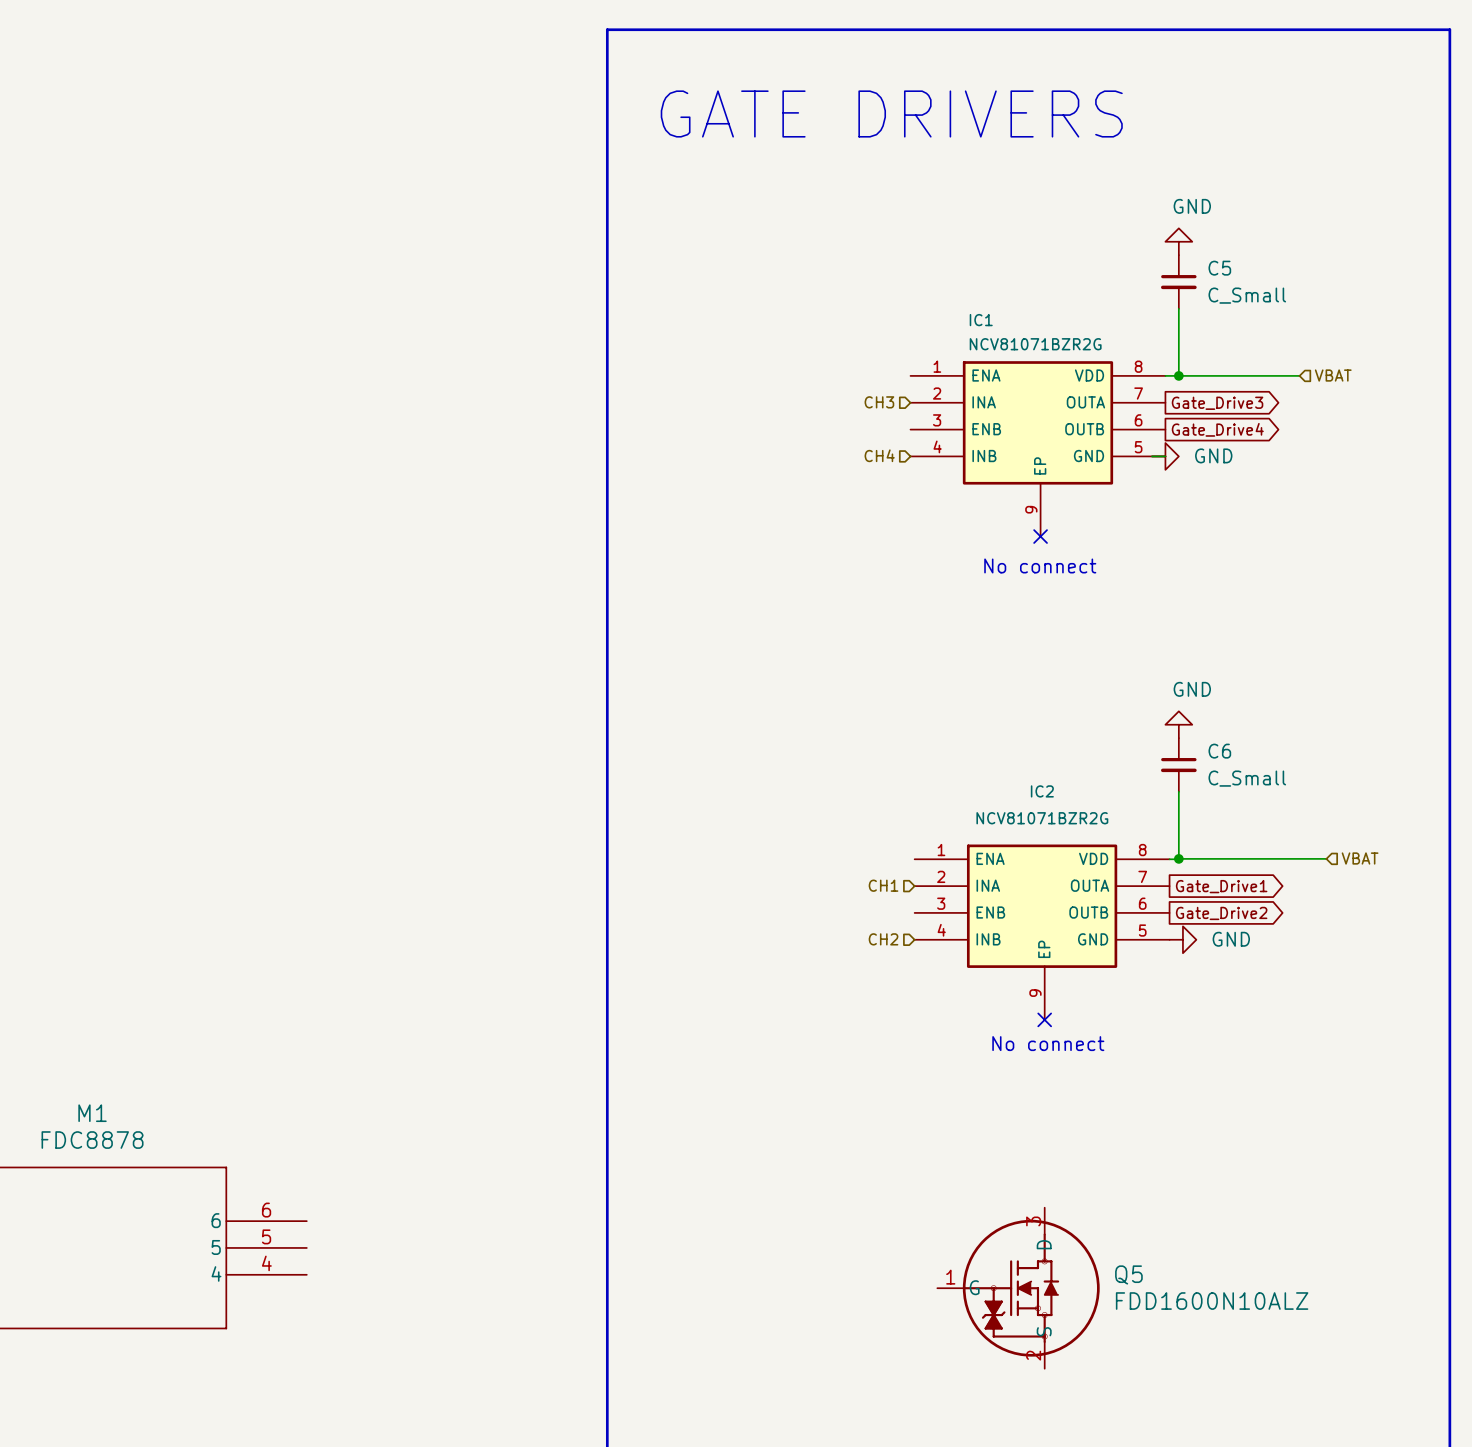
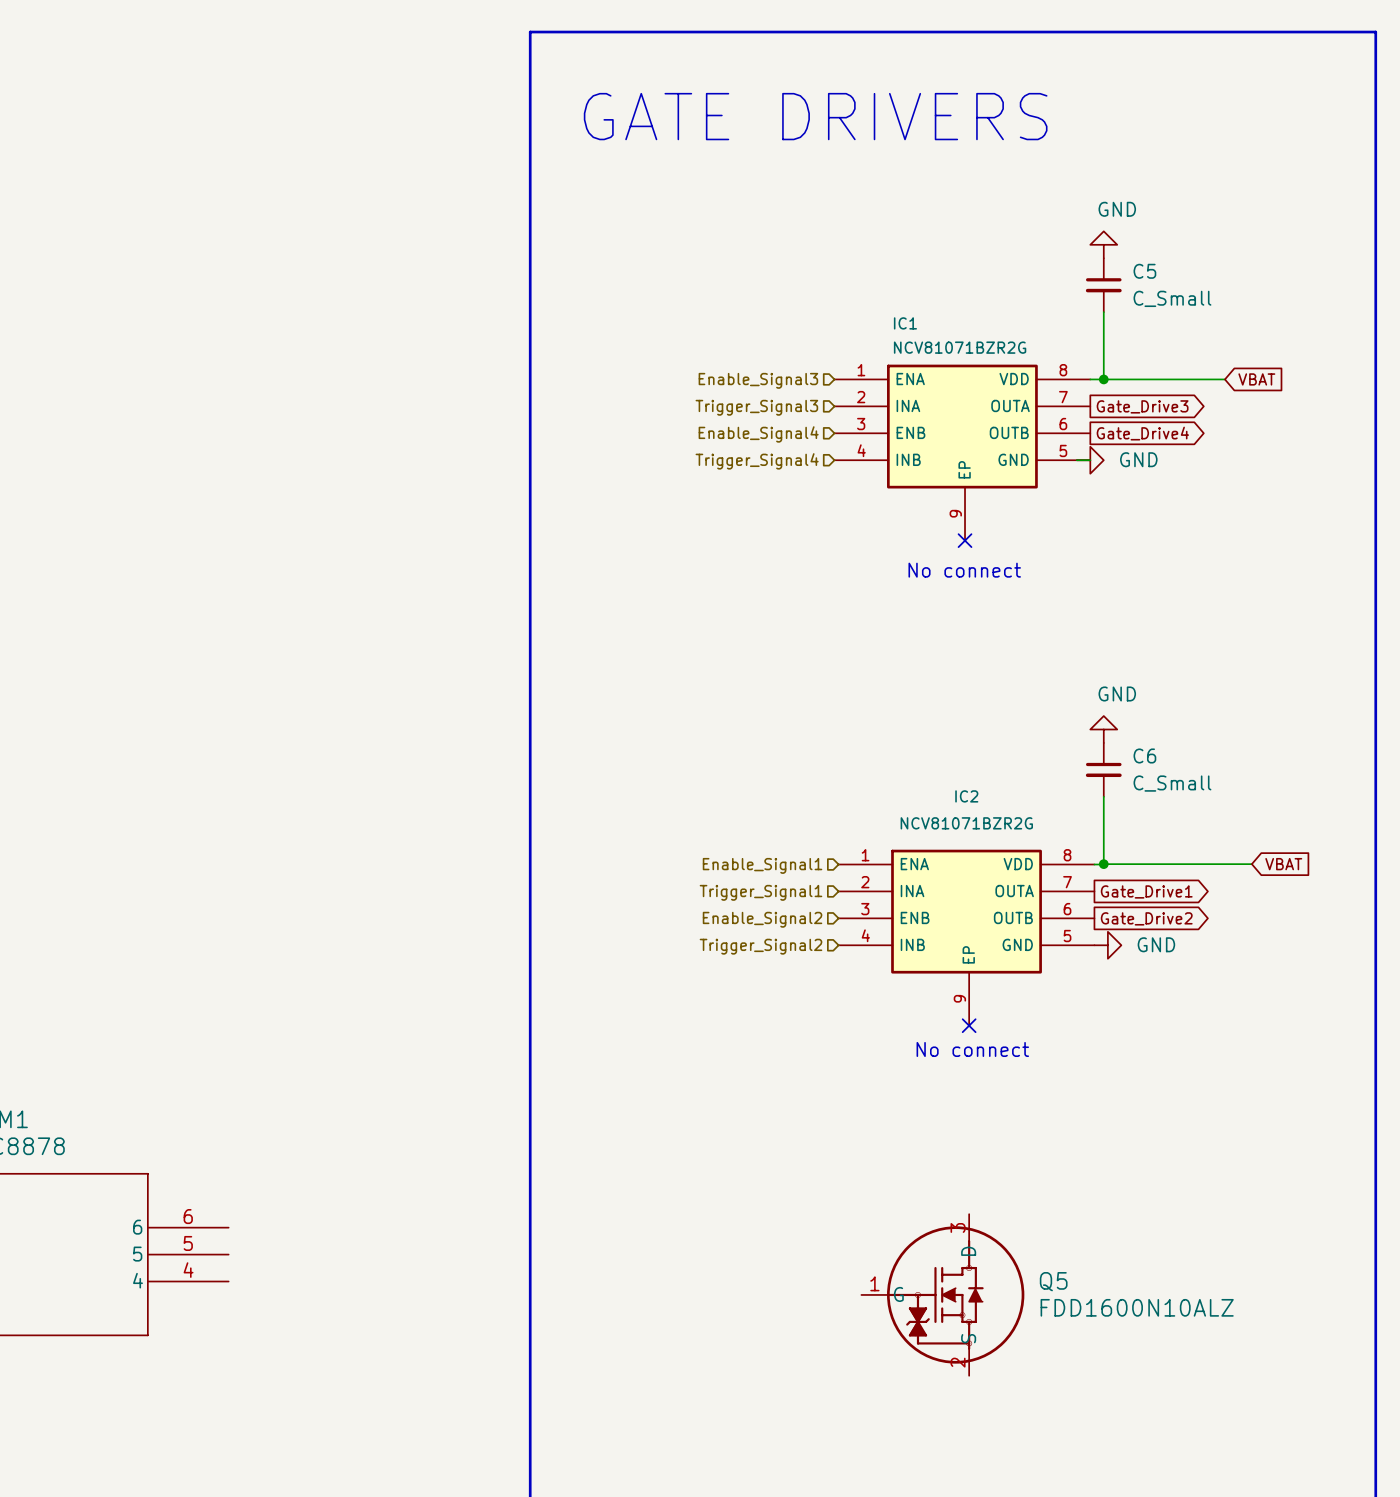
global label: none -> VBAT (1256, 379)
hierarchical label: VBAT (1333, 375) -> none
hierarchical label: none -> Enable_Signal3 (758, 380)
hierarchical label: CH3 (879, 402) -> Trigger_Signal3 (756, 407)
hierarchical label: none -> Enable_Signal4 (758, 434)
hierarchical label: CH4 (879, 455) -> Trigger_Signal4 (757, 461)
global label: none -> VBAT (1283, 864)
hierarchical label: VBAT (1360, 858) -> none
hierarchical label: none -> Enable_Signal1 (762, 865)
hierarchical label: CH1 (883, 885) -> Trigger_Signal1 (760, 892)
hierarchical label: none -> Enable_Signal2 (762, 919)
hierarchical label: CH2 (883, 939) -> Trigger_Signal2 (760, 946)

